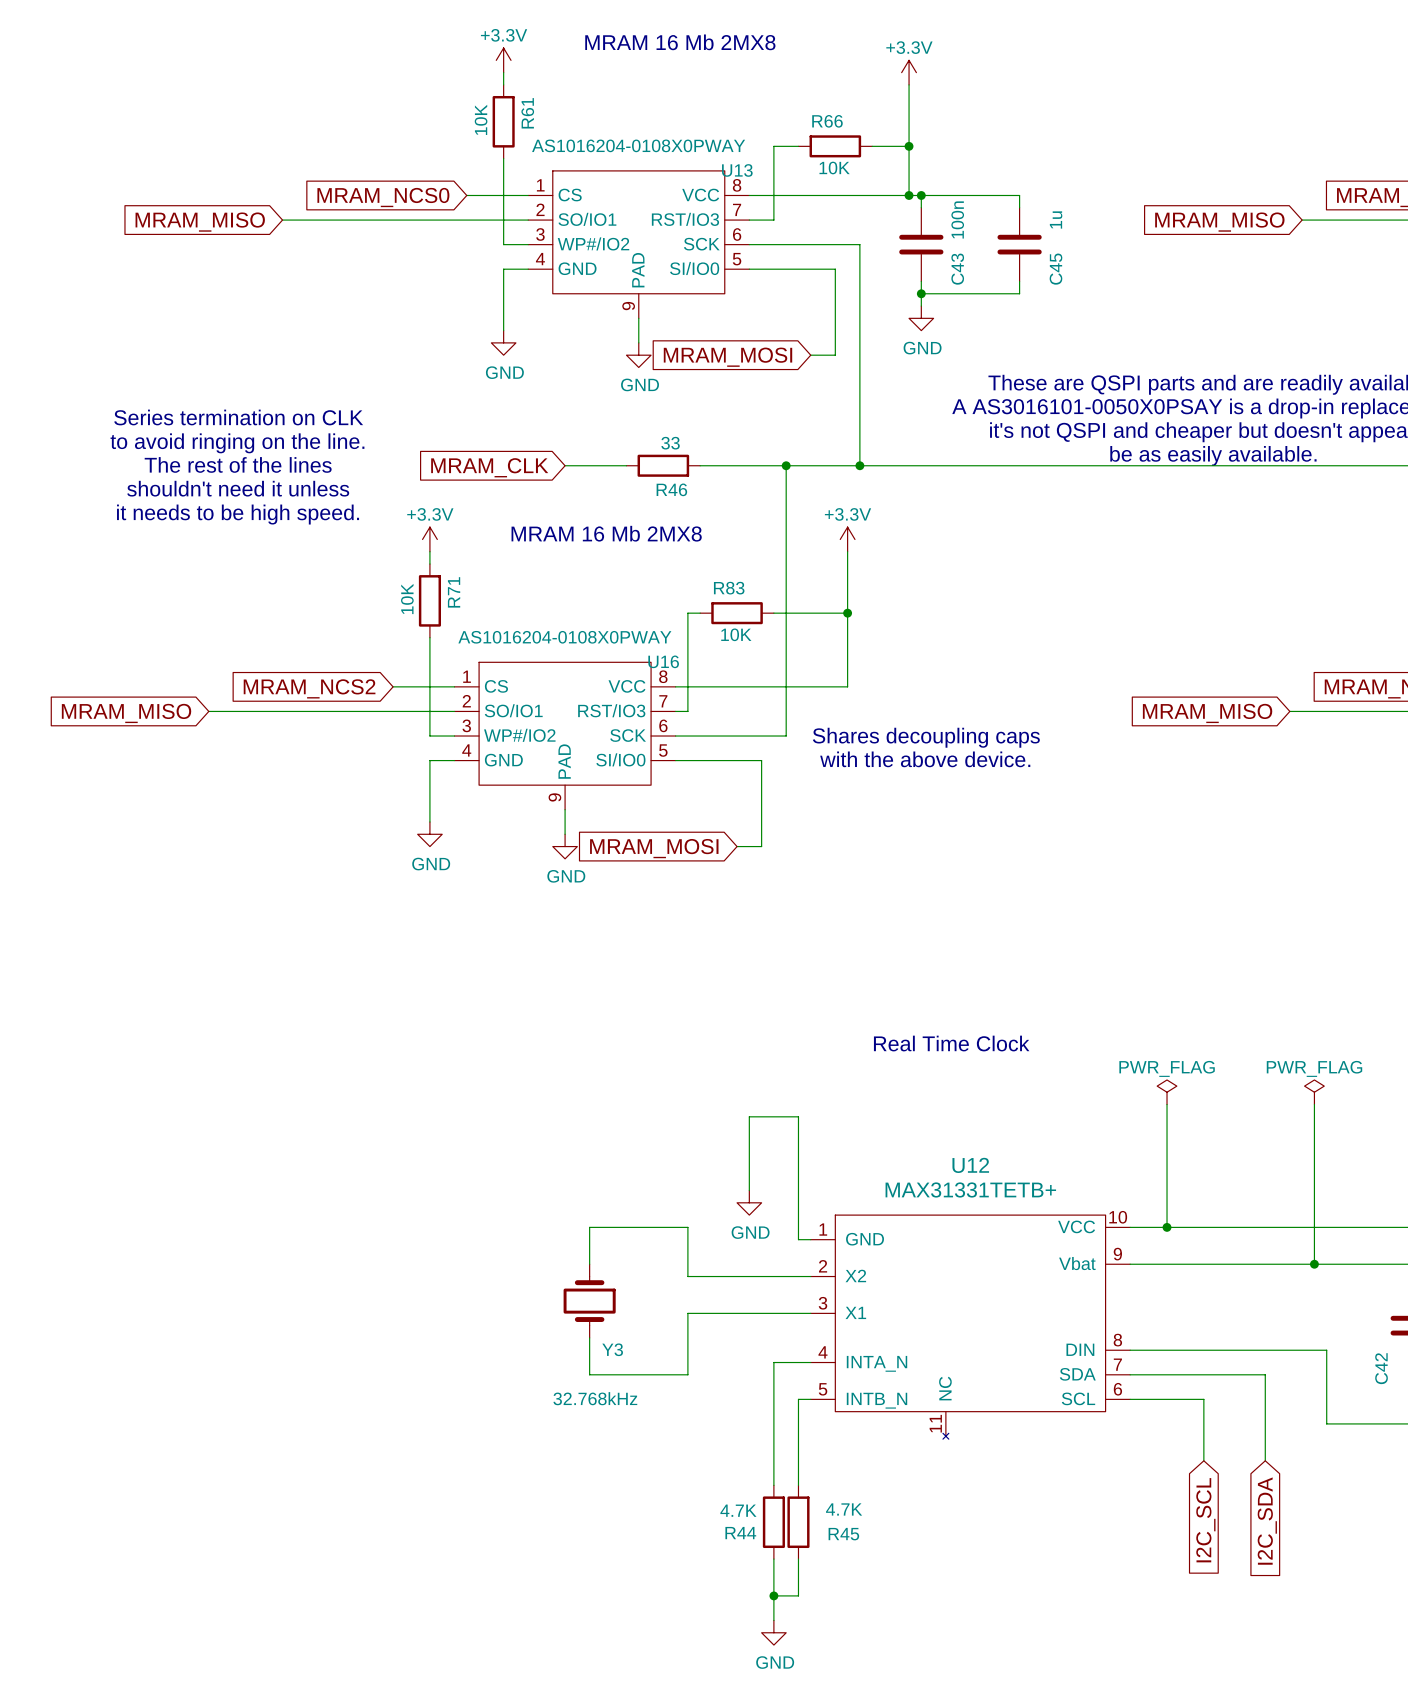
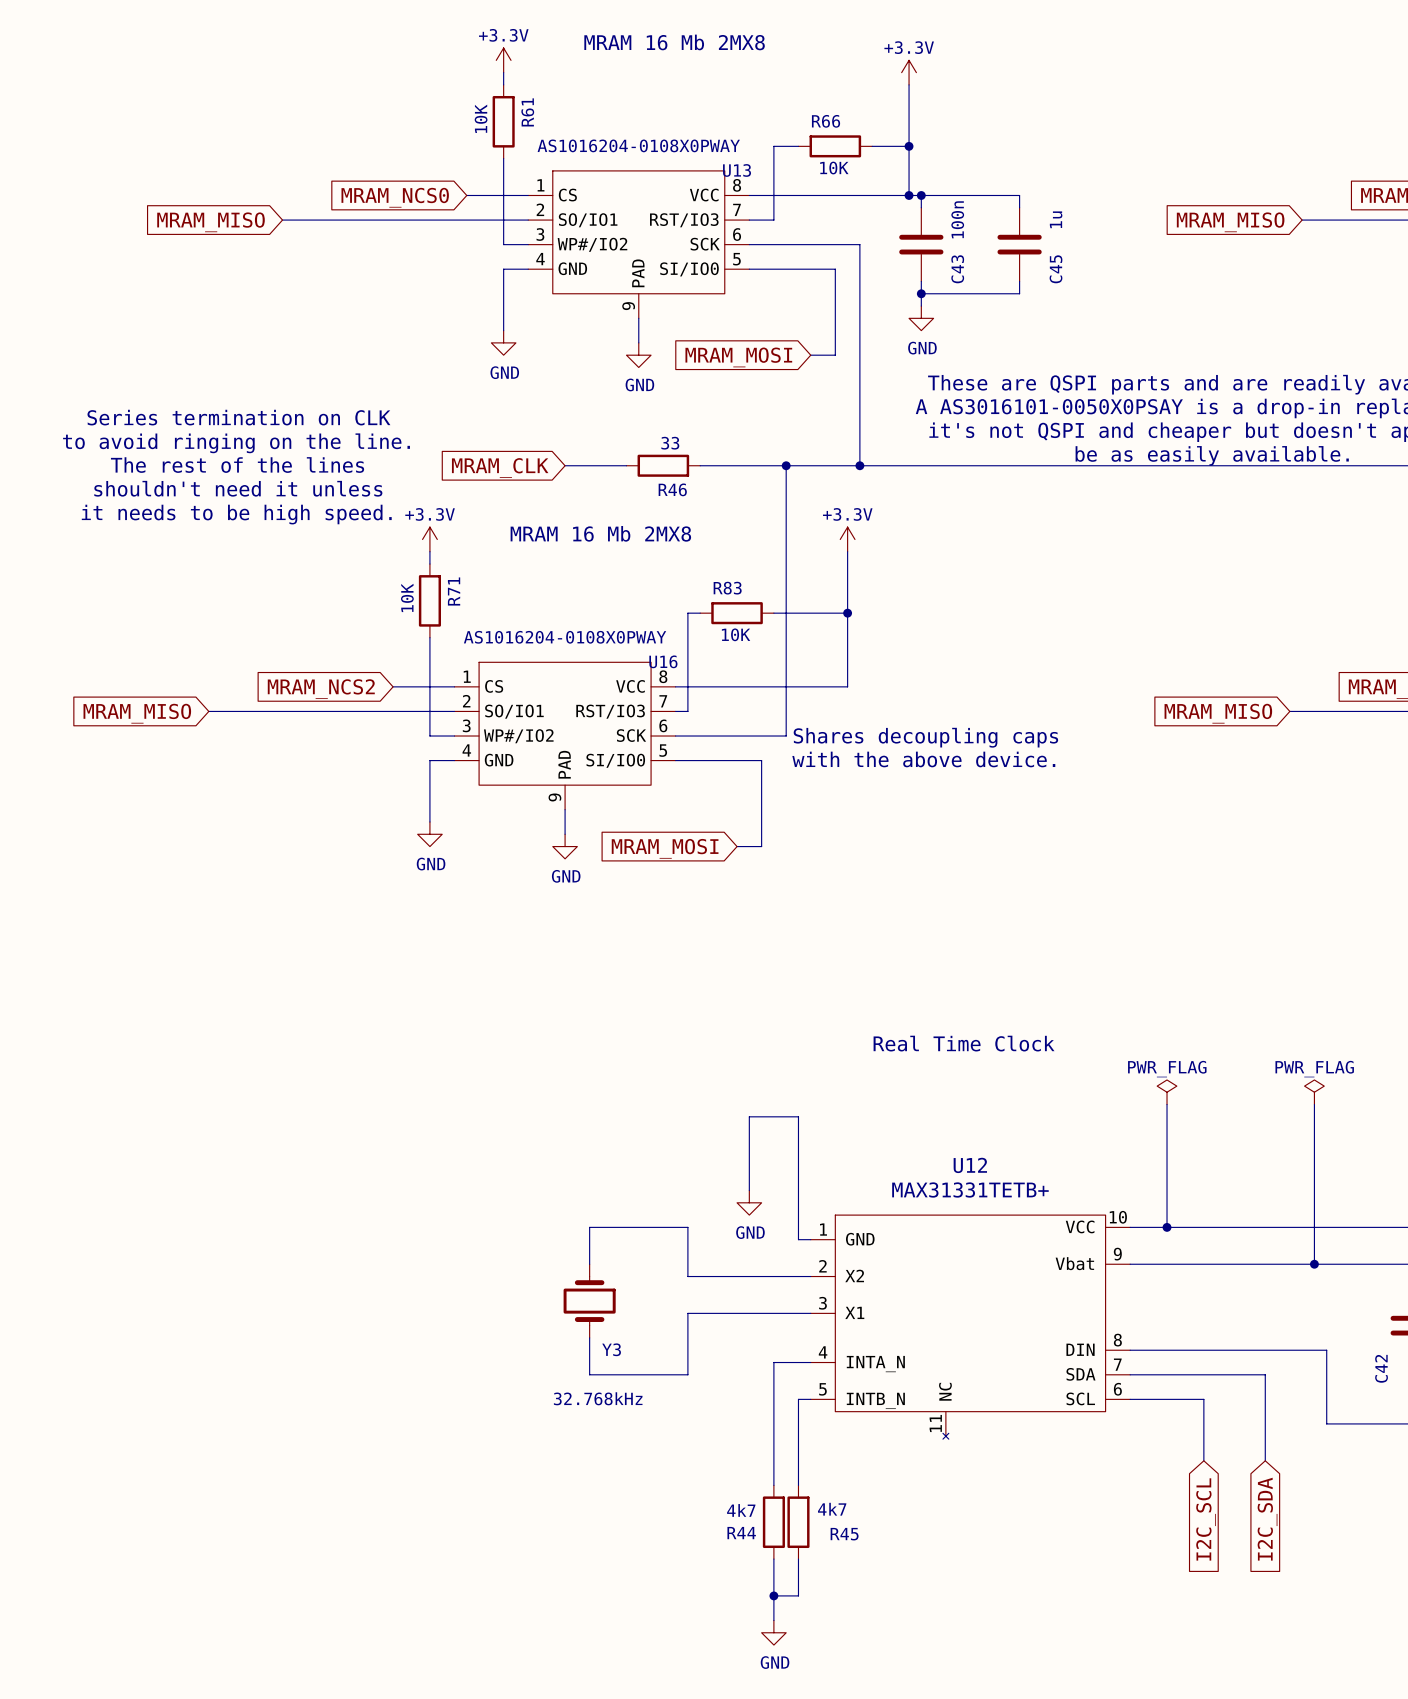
R45 value: 4.7K (844, 1509) -> 4k7 (832, 1509)
R44 value: 4.7K (738, 1510) -> 4k7 (741, 1510)

